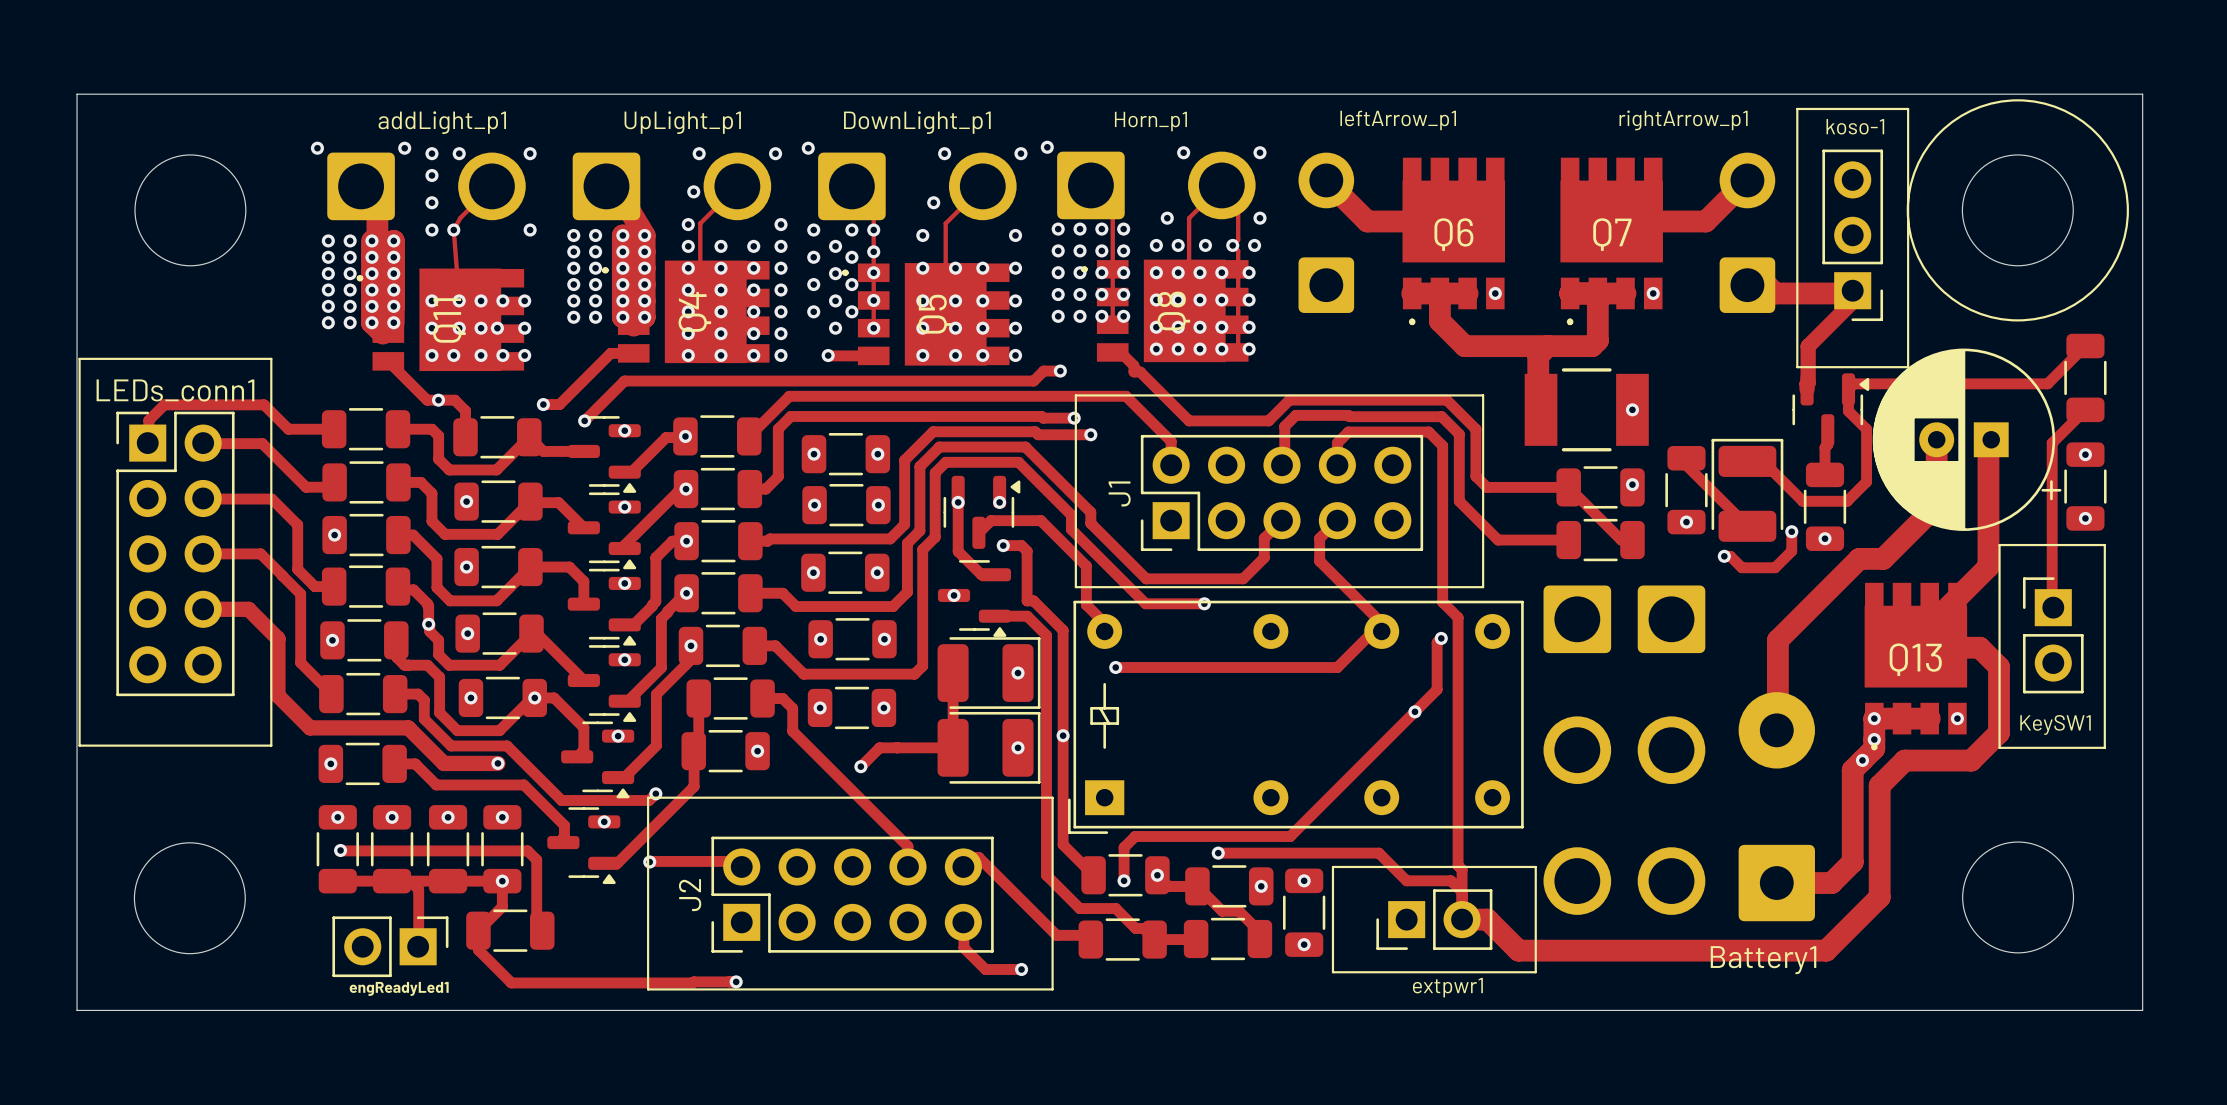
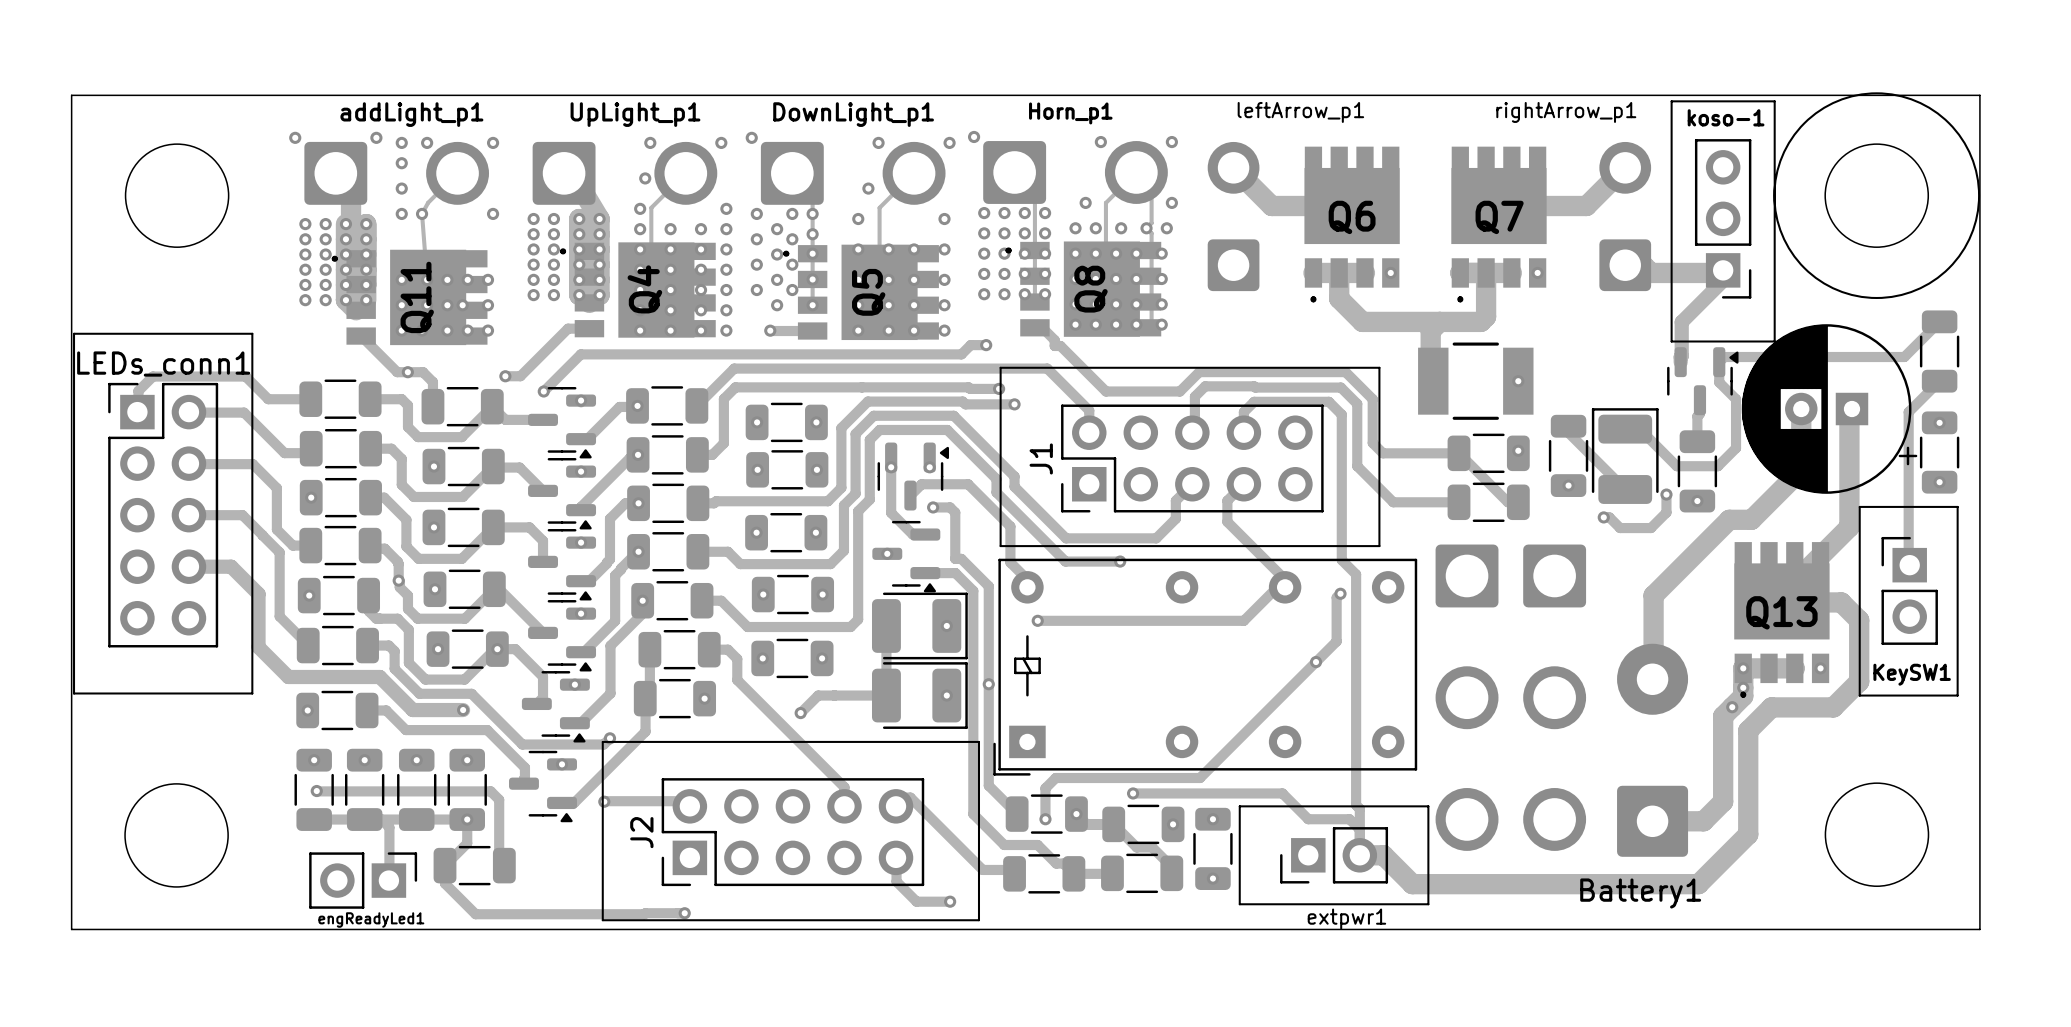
board edge: (77, 102) (77, 94) (2142, 94) (2142, 1010) (77, 1010) (77, 999) -> (71, 95) (1979, 95) (1979, 929) (71, 929)

